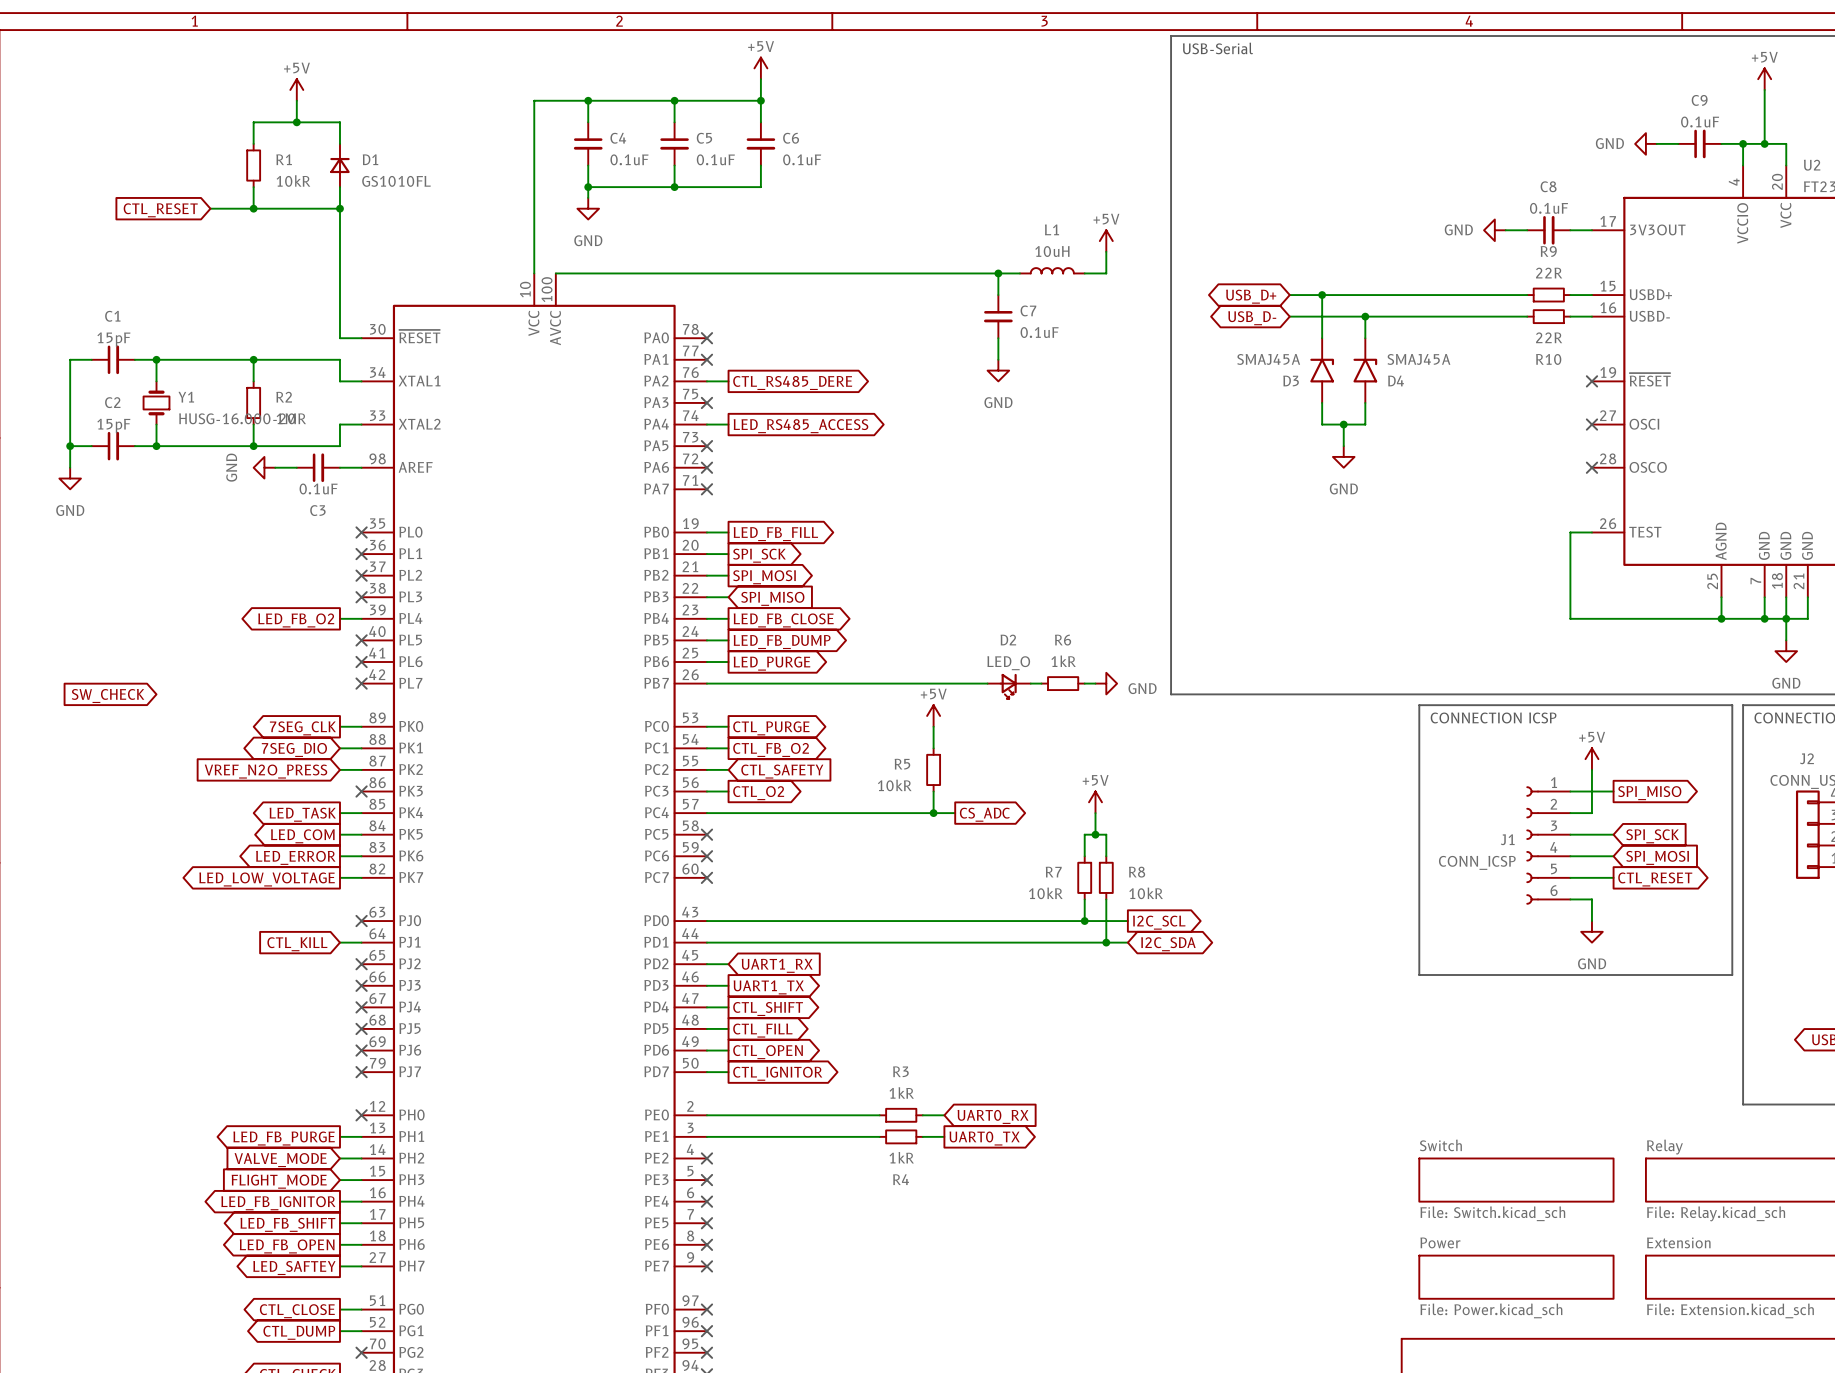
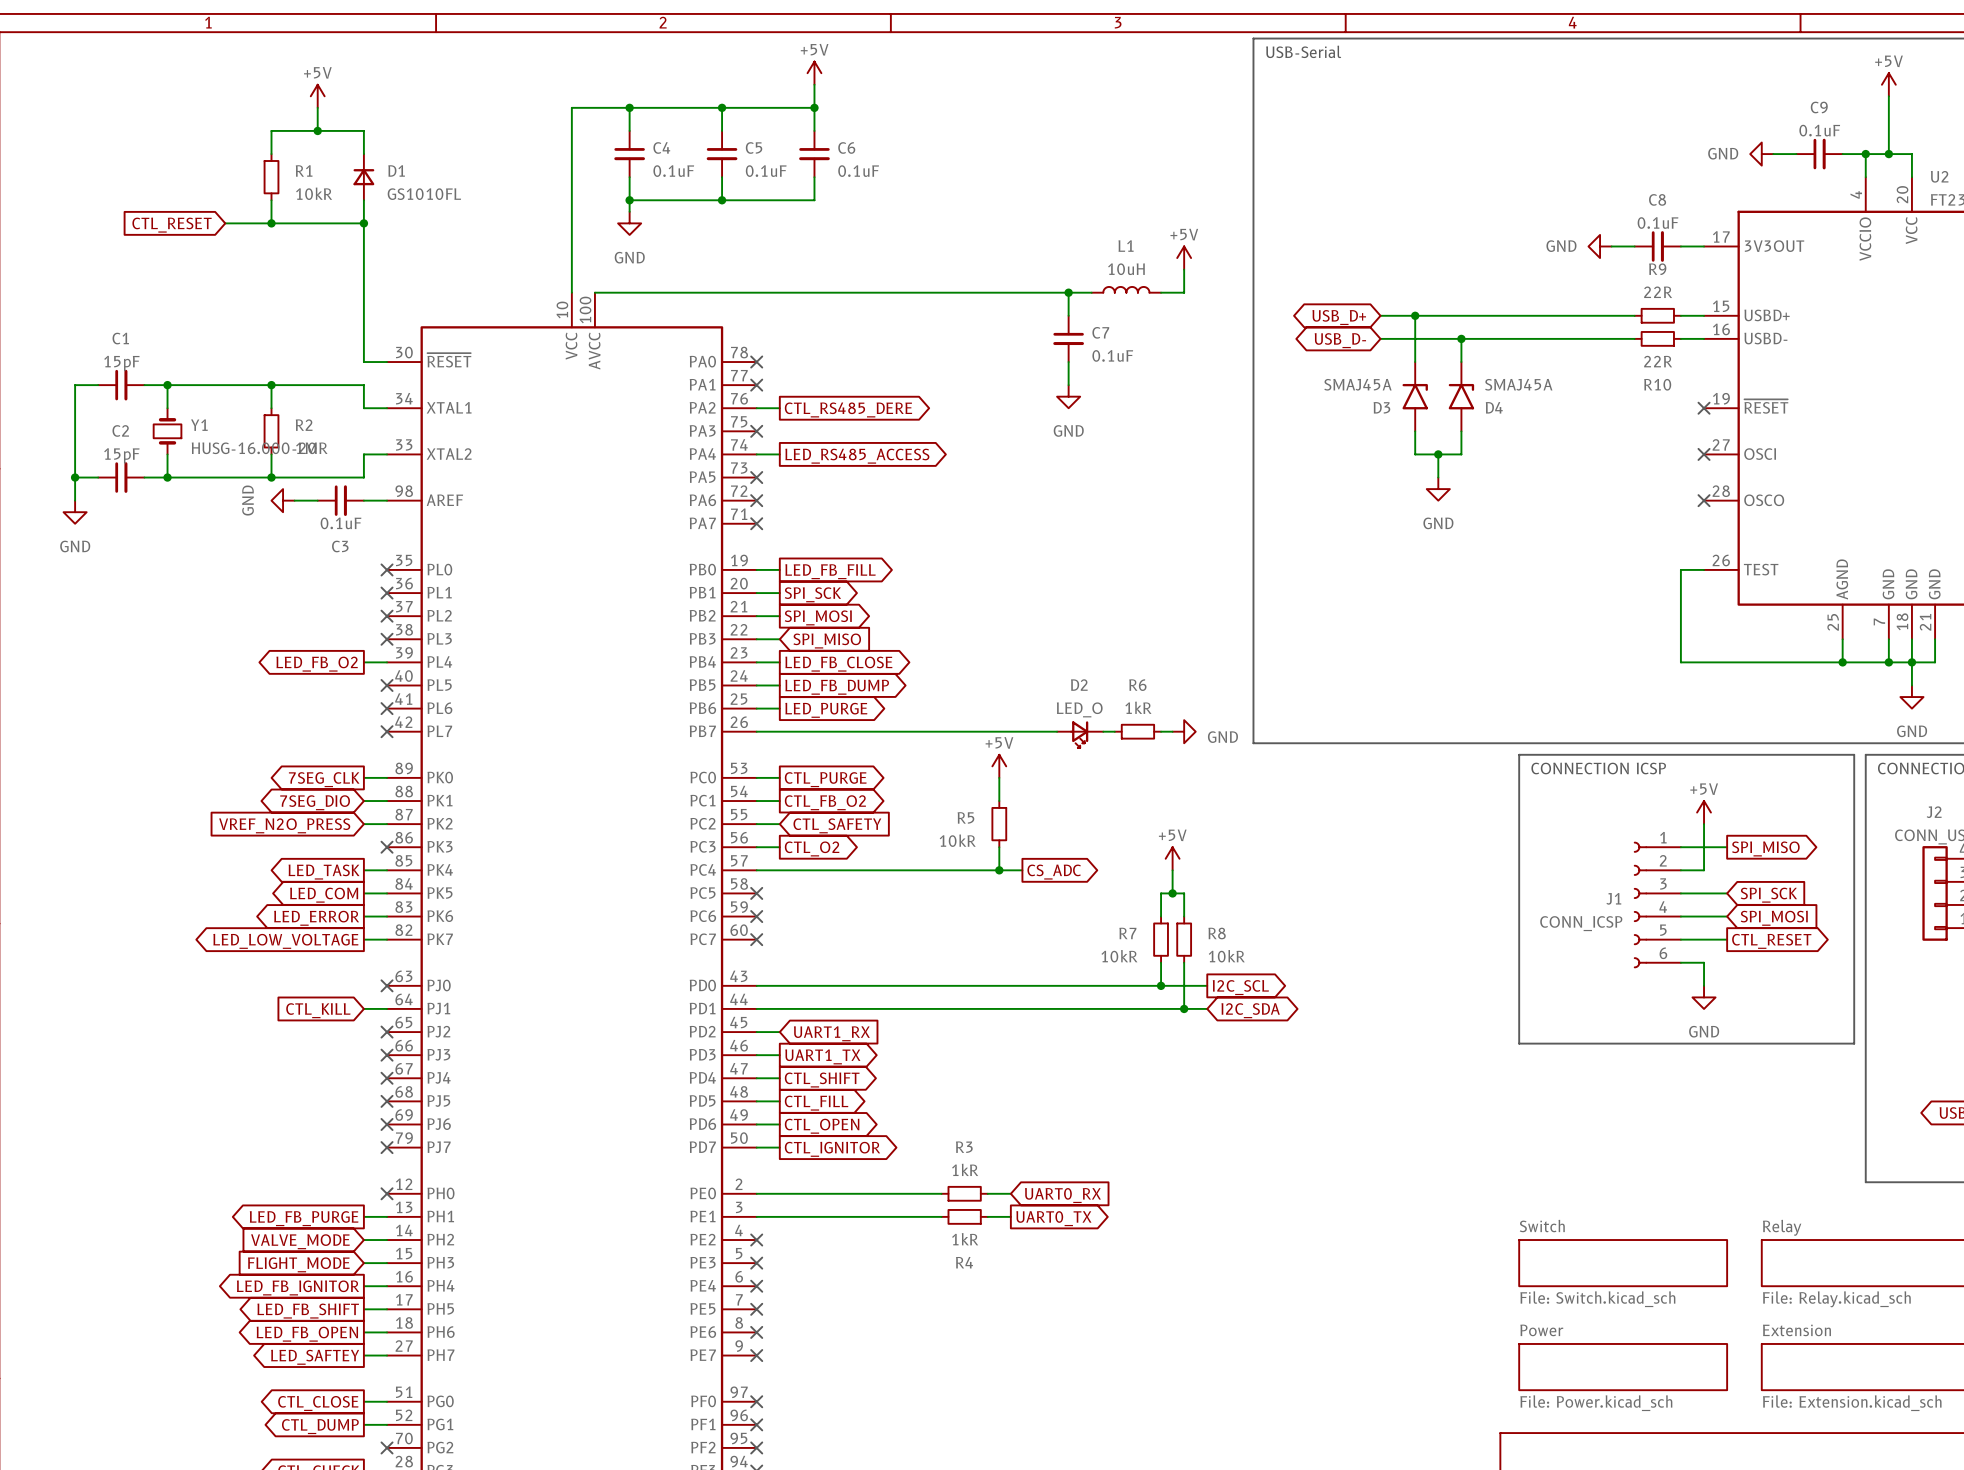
global label: SW_CHECK (108, 695) -> none

